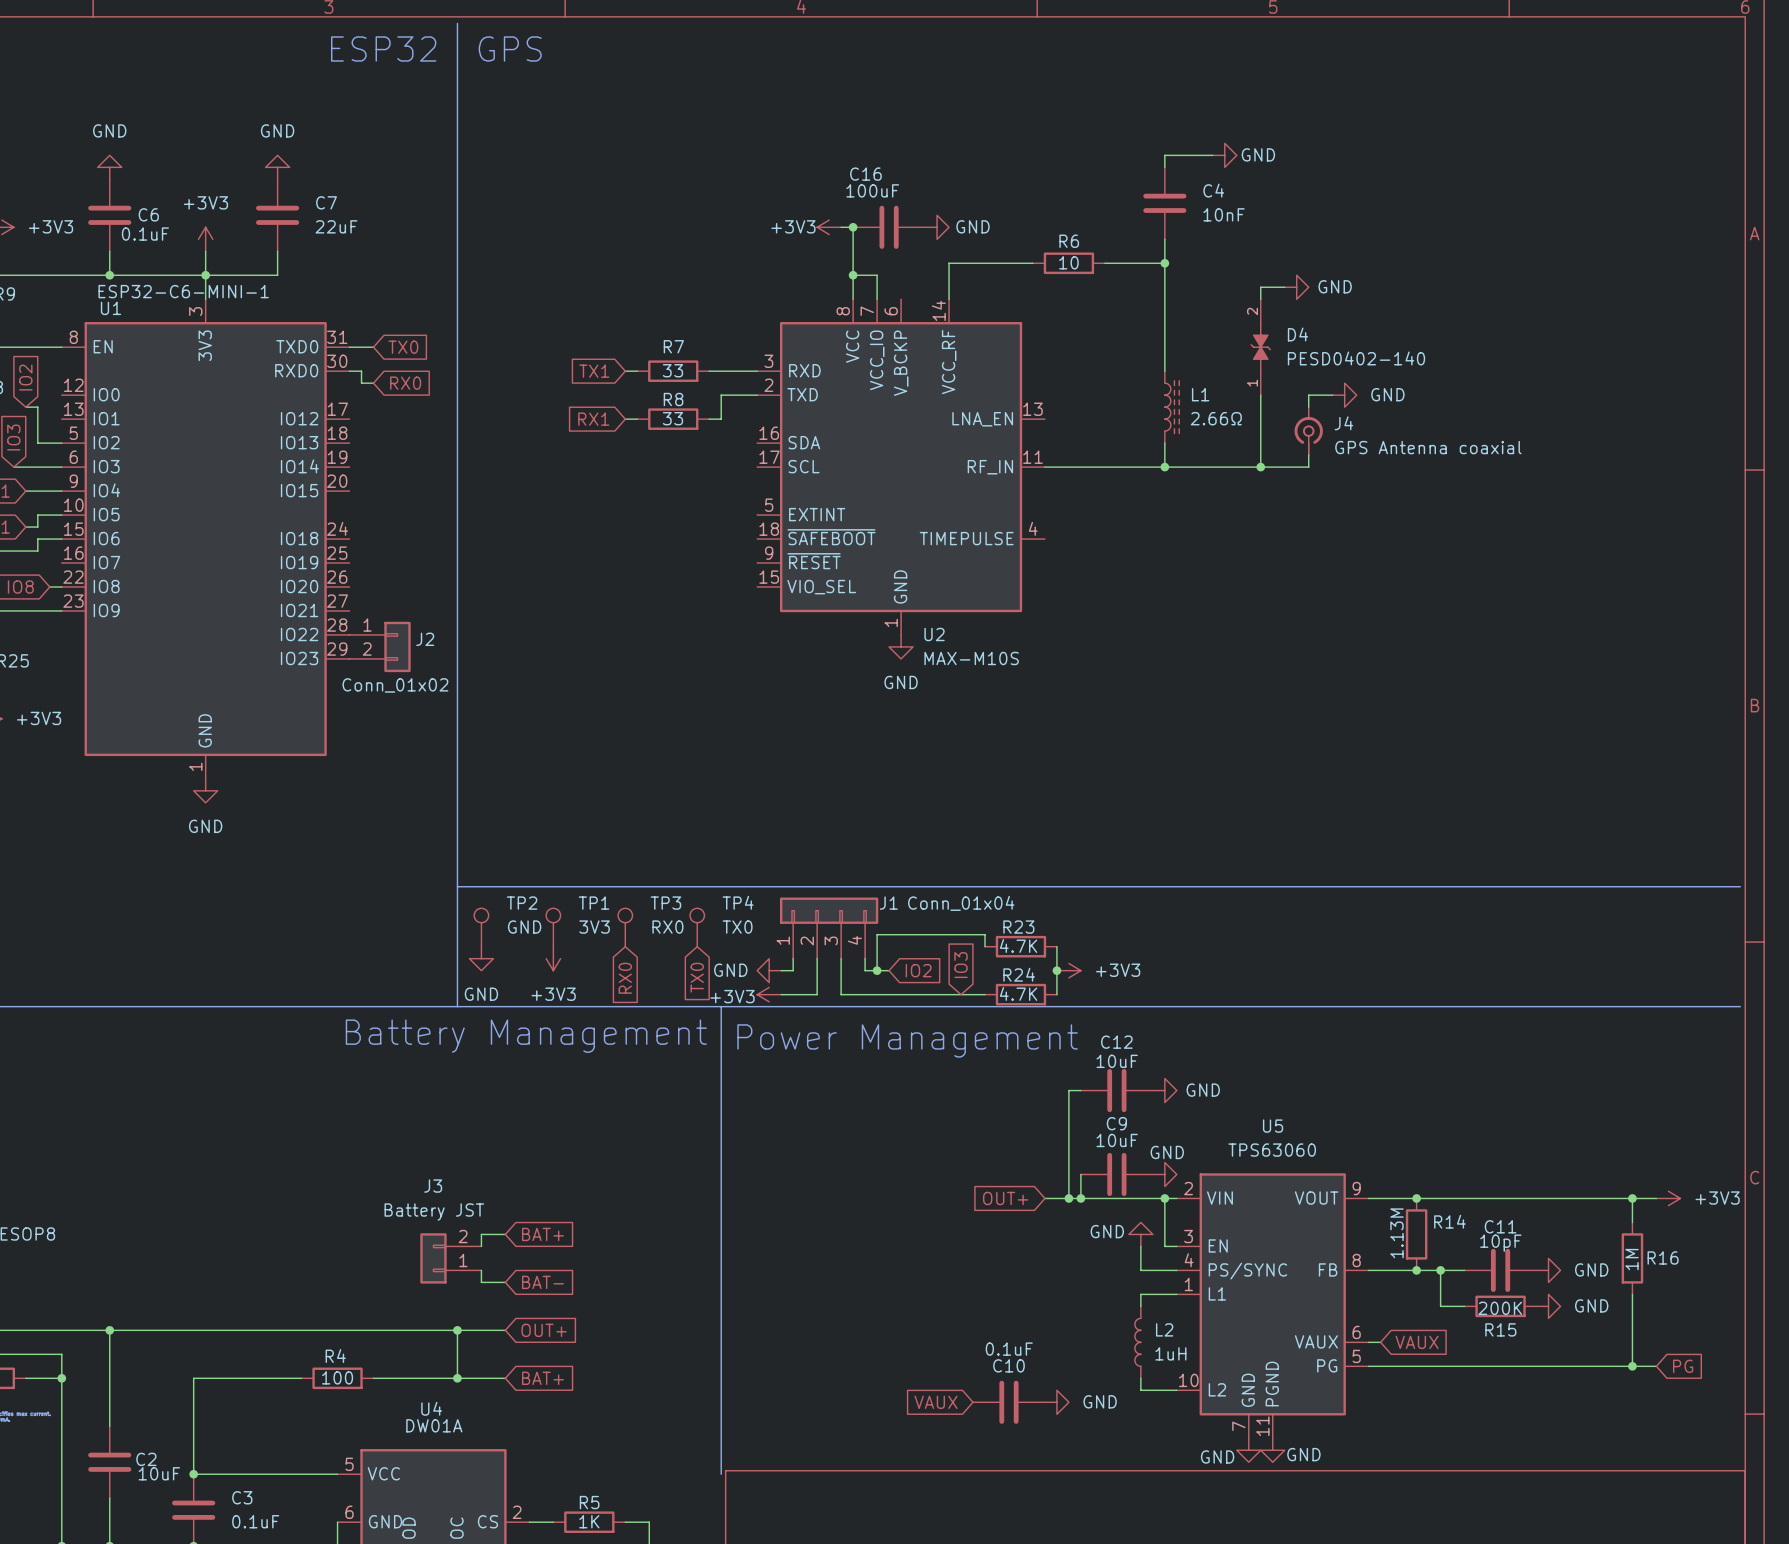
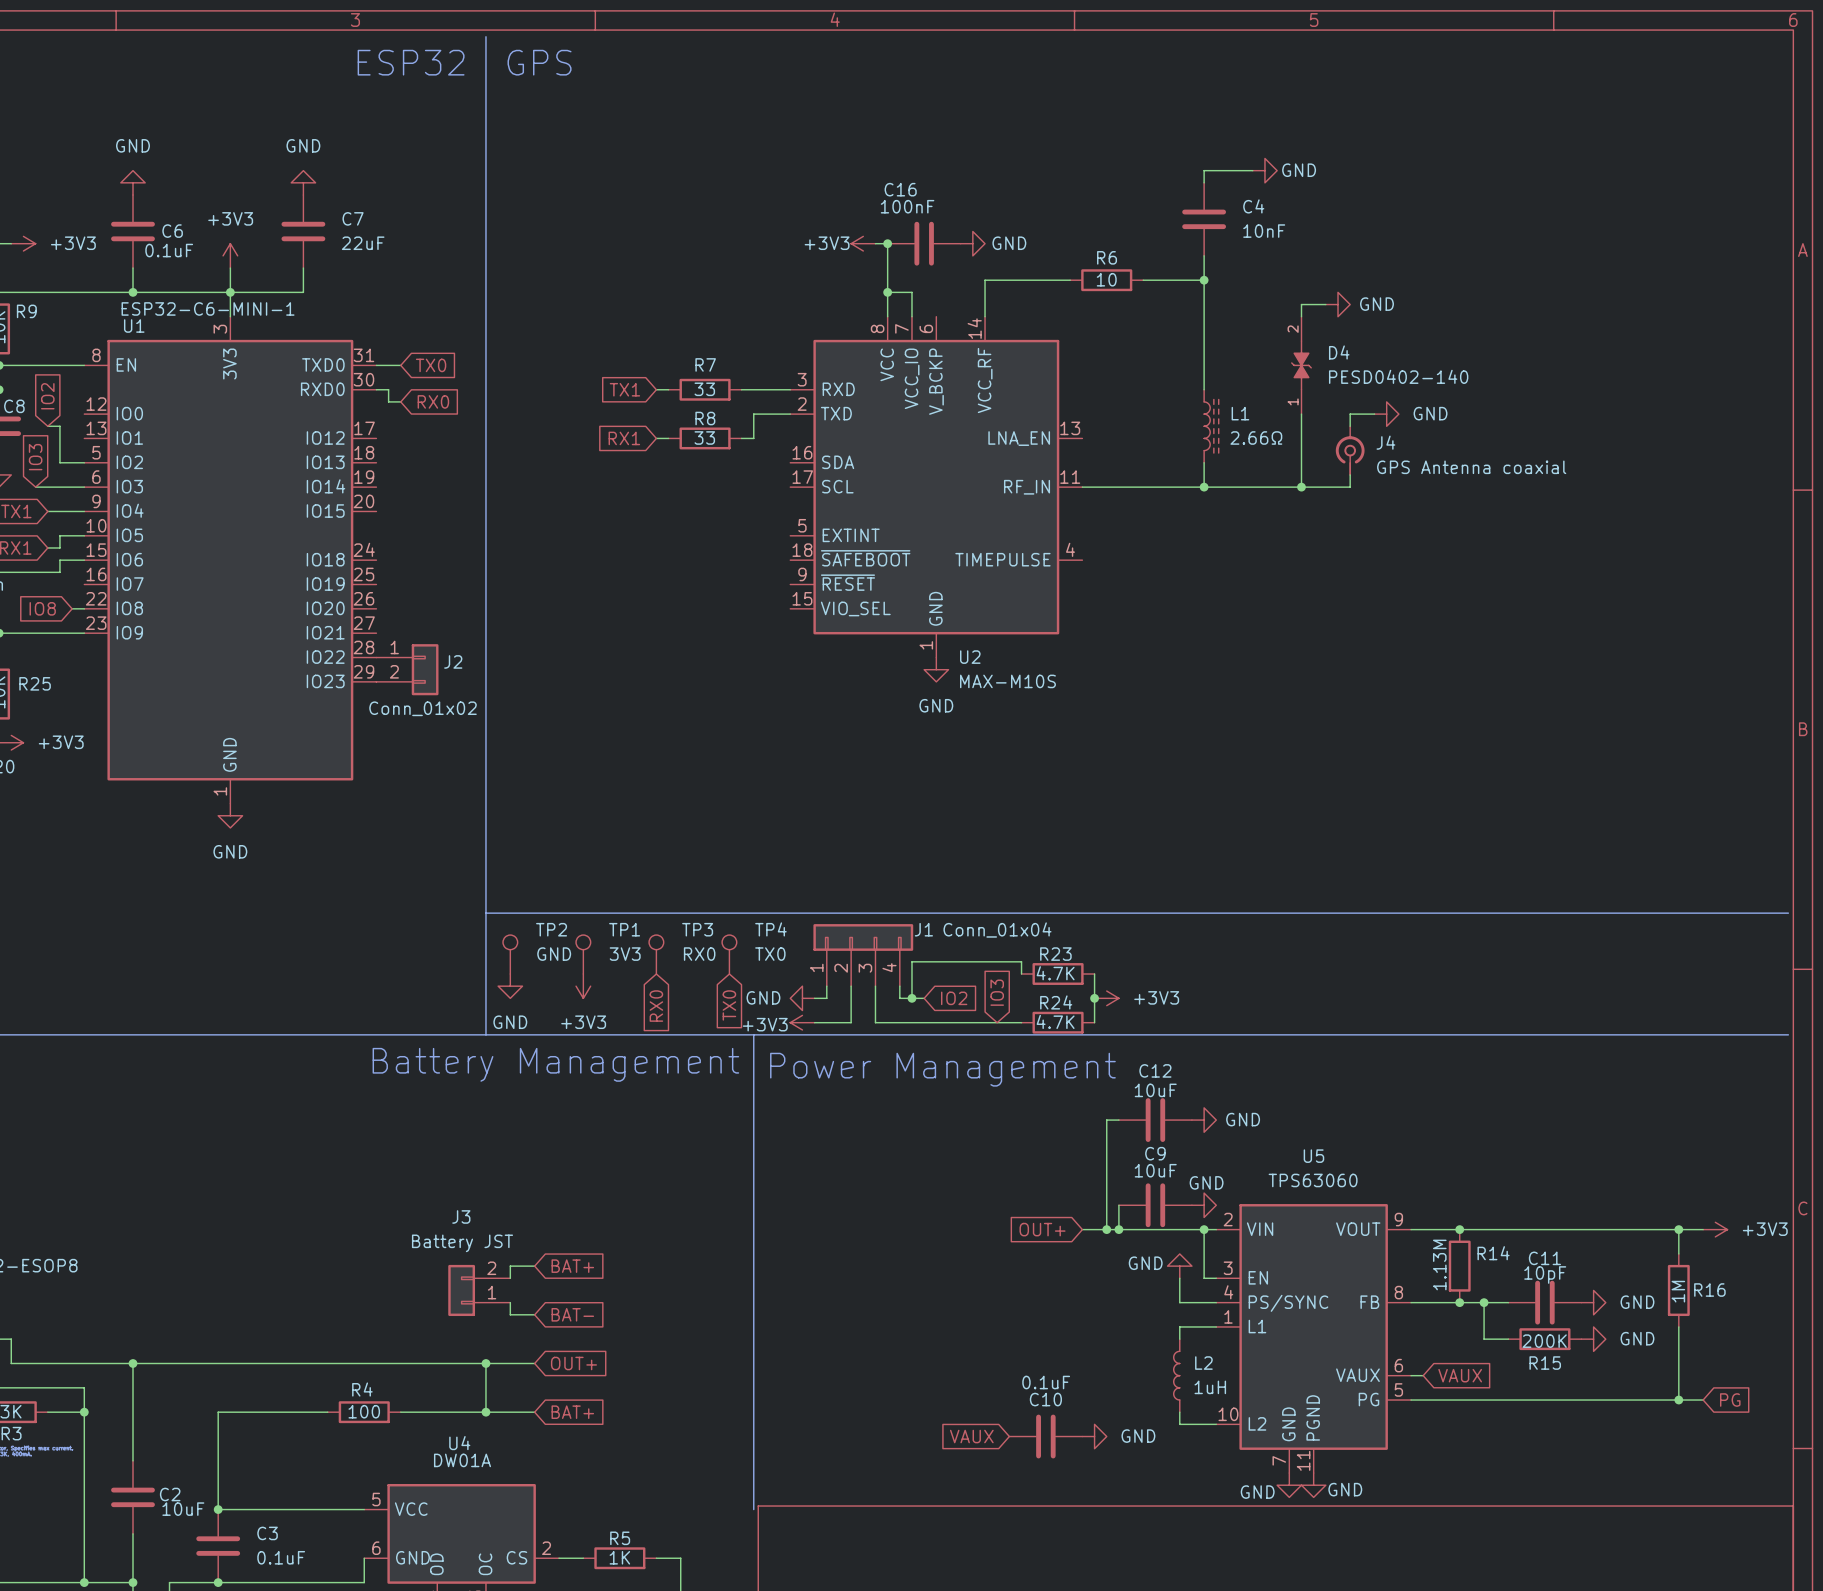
C16 value: 100uF (872, 190) -> 100nF (907, 206)

